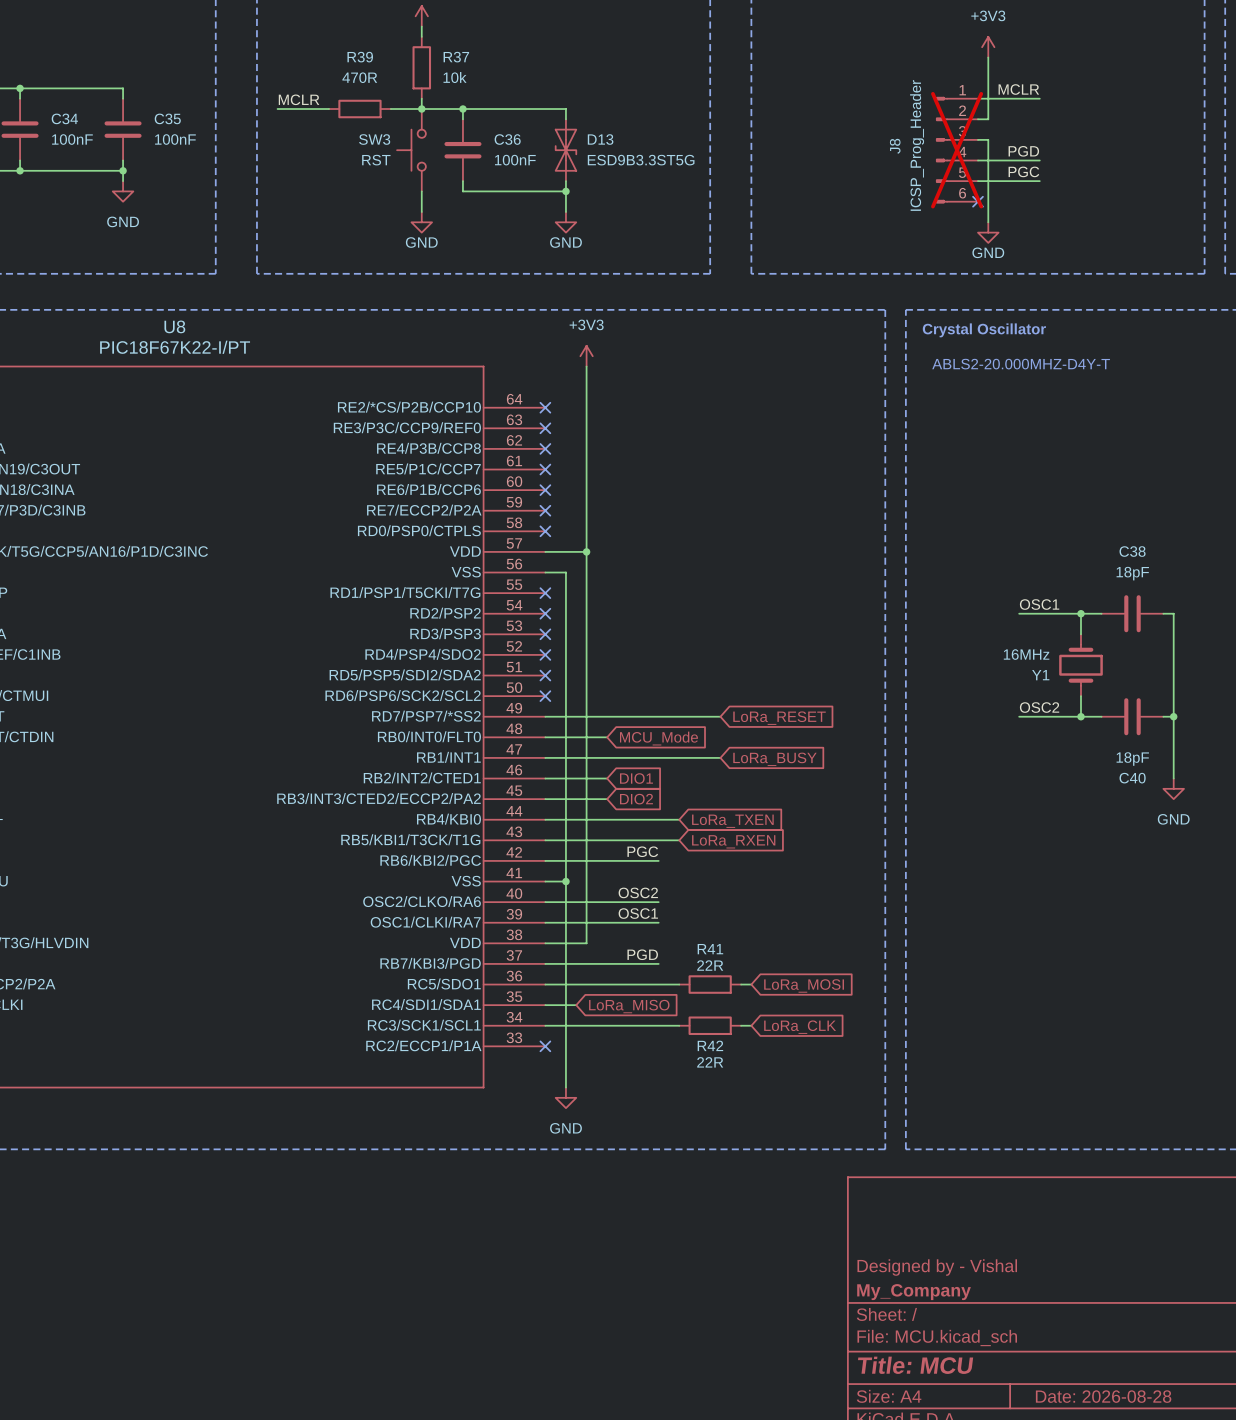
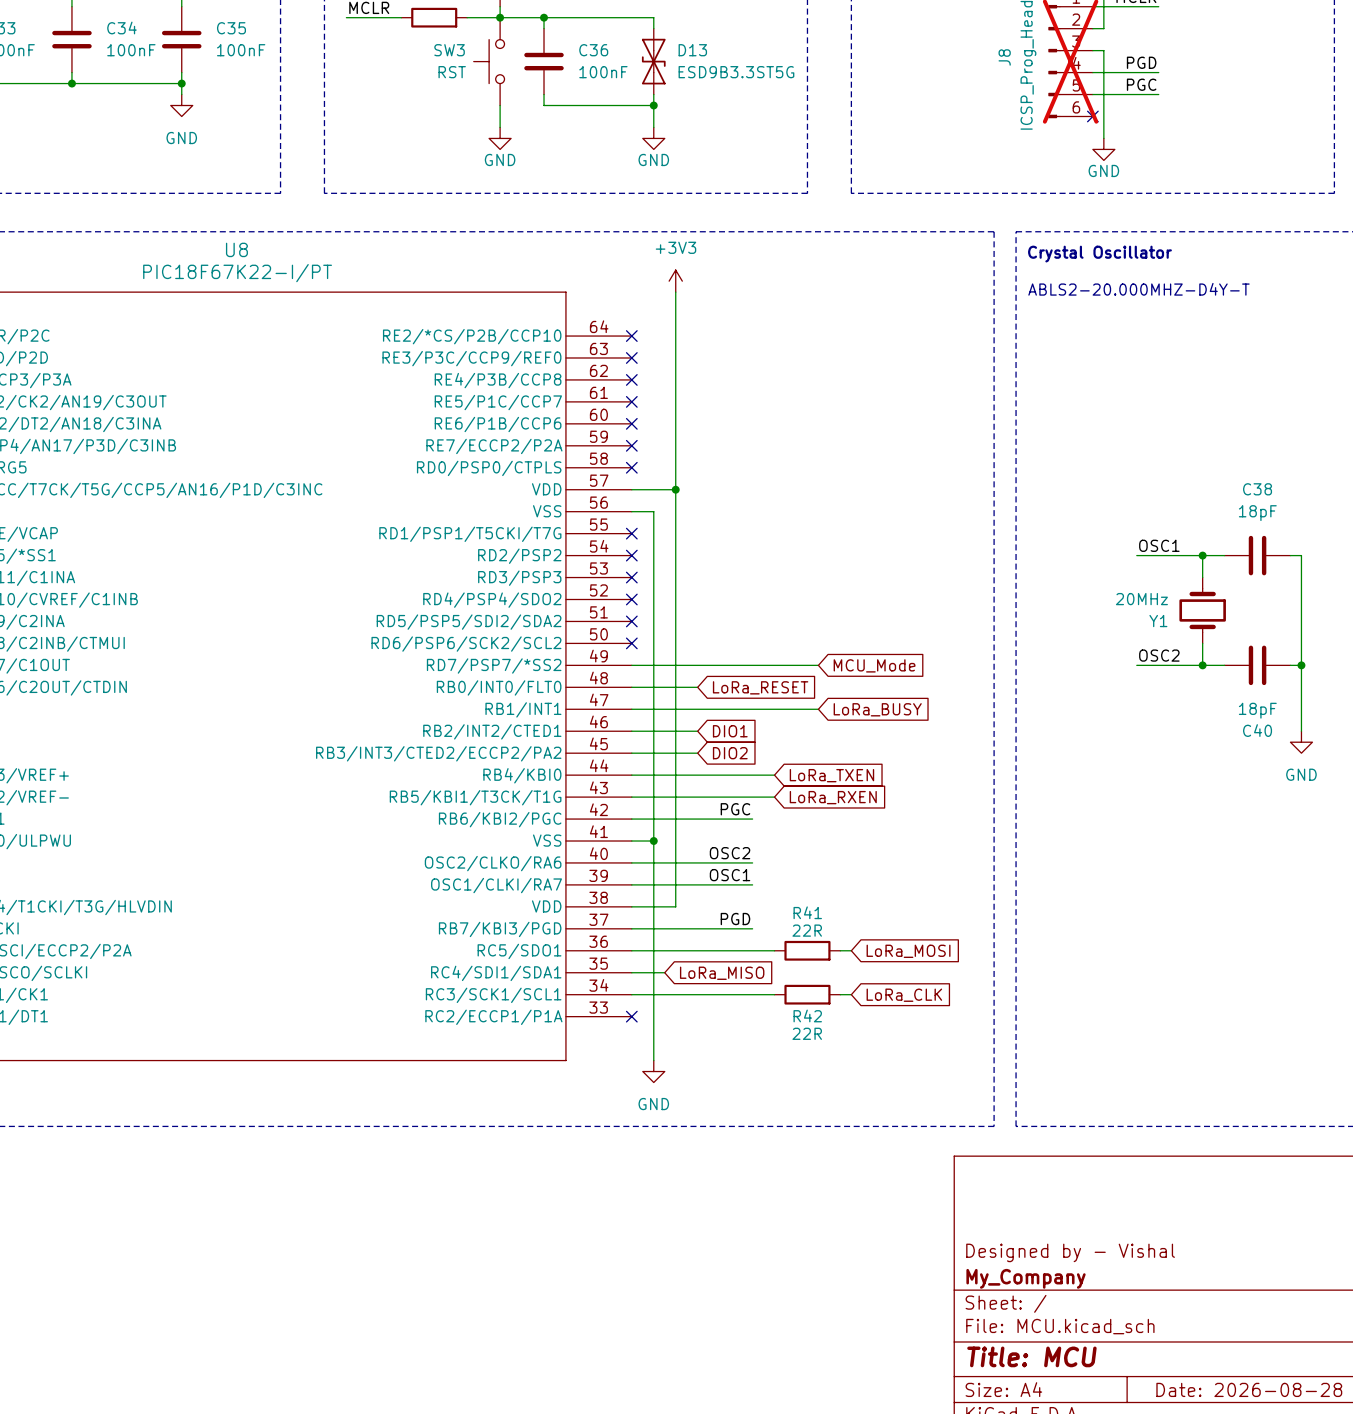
Y1 value: 16MHz (1026, 654) -> 20MHz (1141, 599)
global label: LoRa_RESET (779, 718) -> MCU_Mode (874, 665)
global label: MCU_Mode (658, 738) -> LoRa_RESET (760, 687)

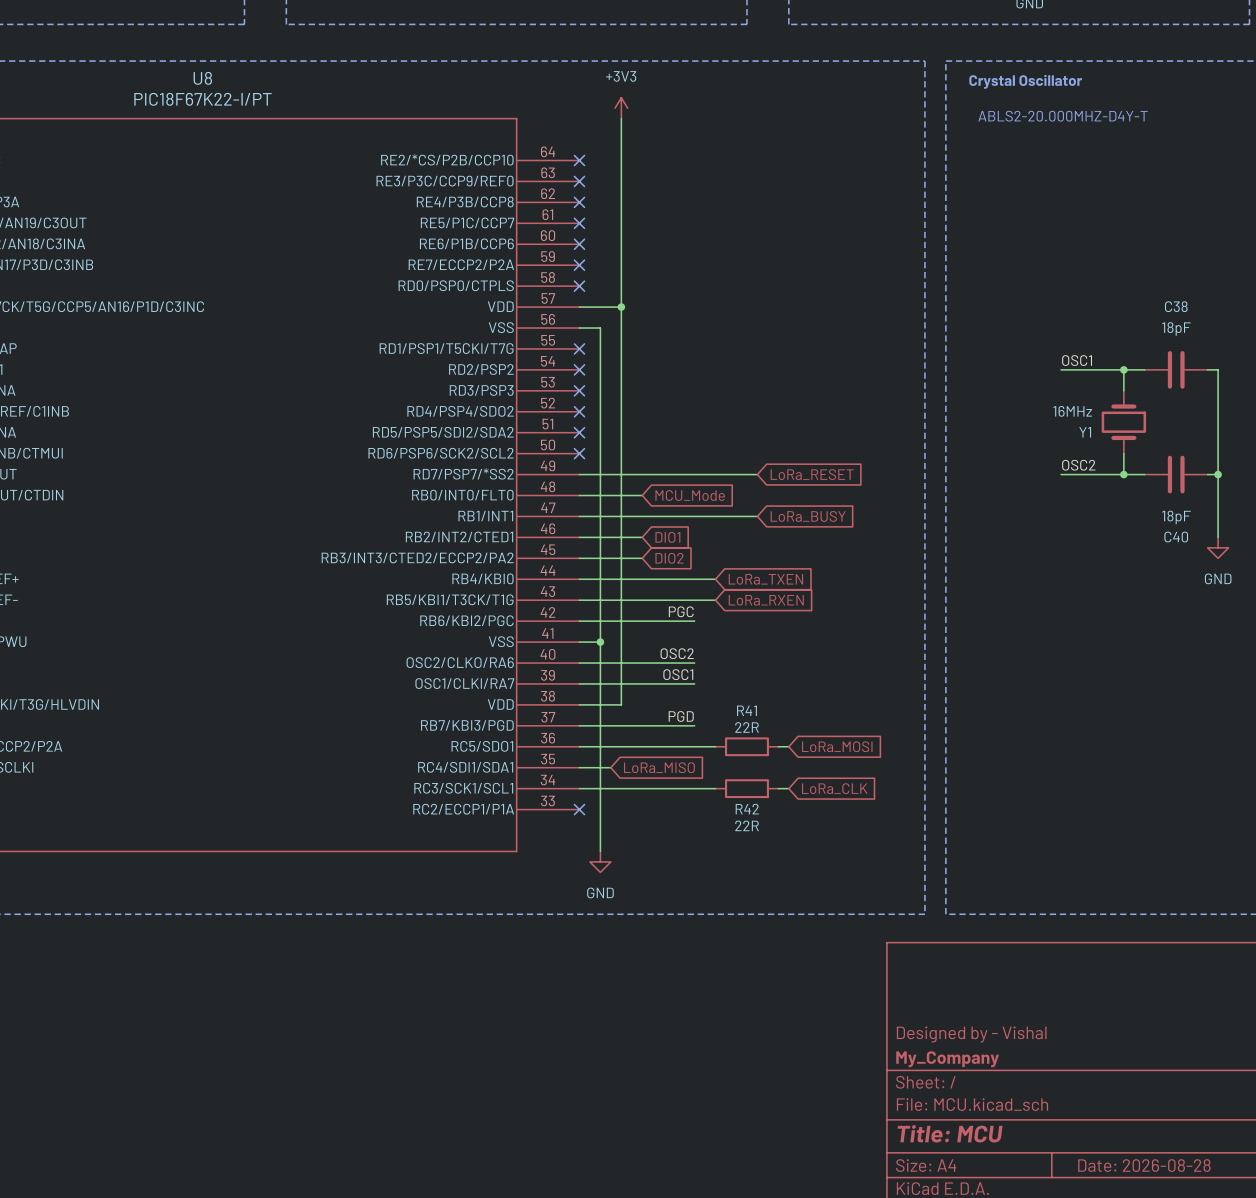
Y1 value: 20MHz (1141, 599) -> 16MHz (1072, 411)
global label: MCU_Mode (874, 665) -> LoRa_RESET (812, 474)
global label: LoRa_RESET (760, 687) -> MCU_Mode (690, 495)

